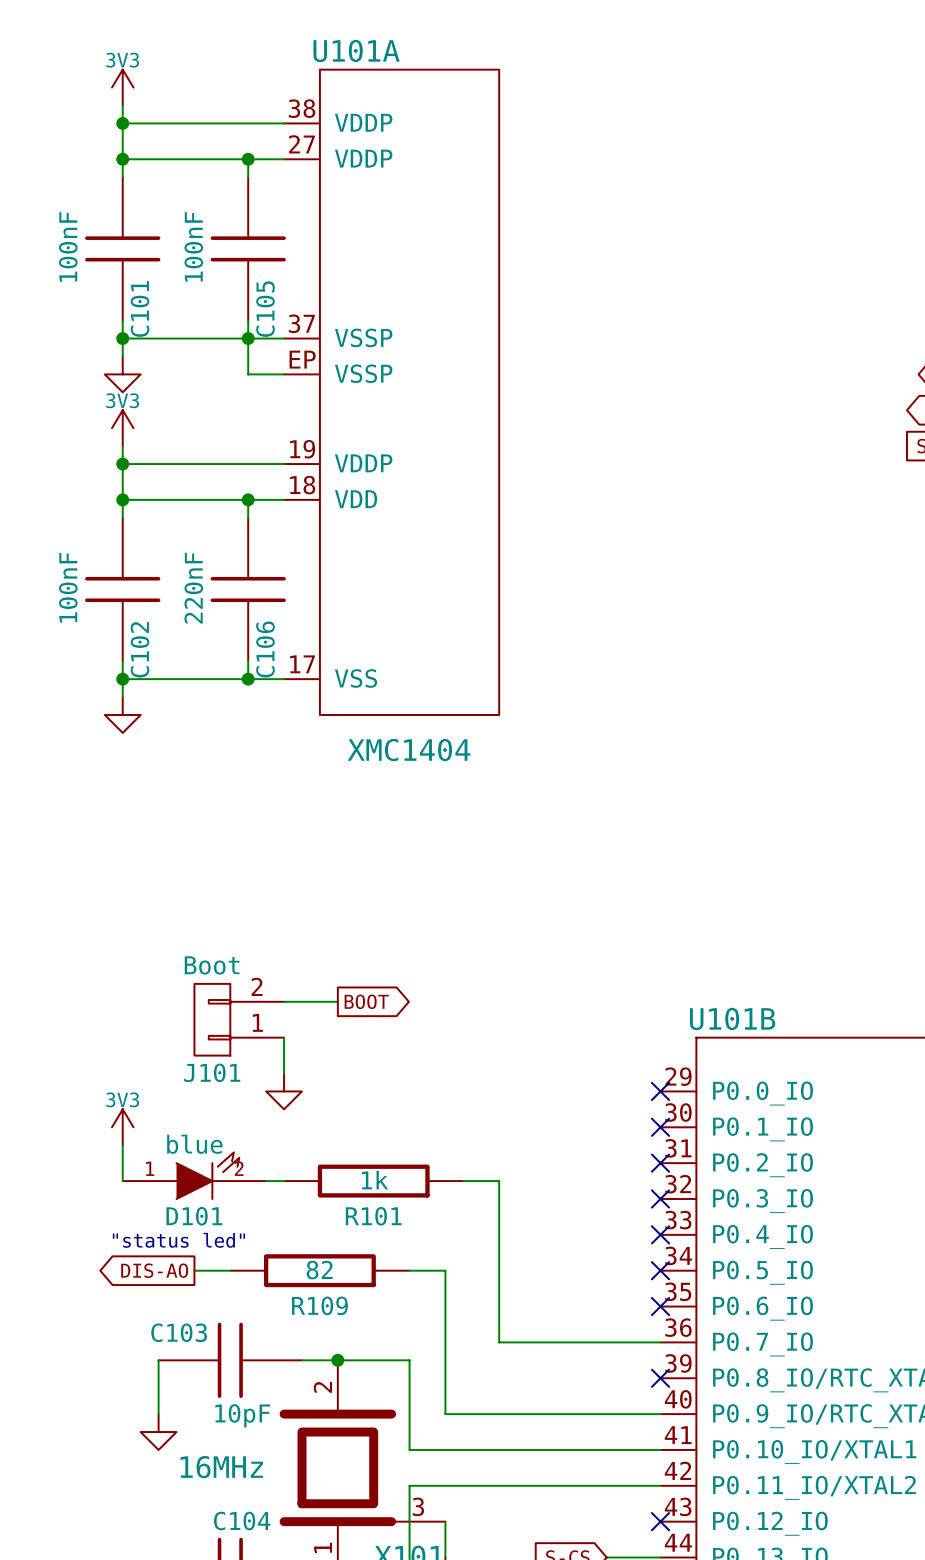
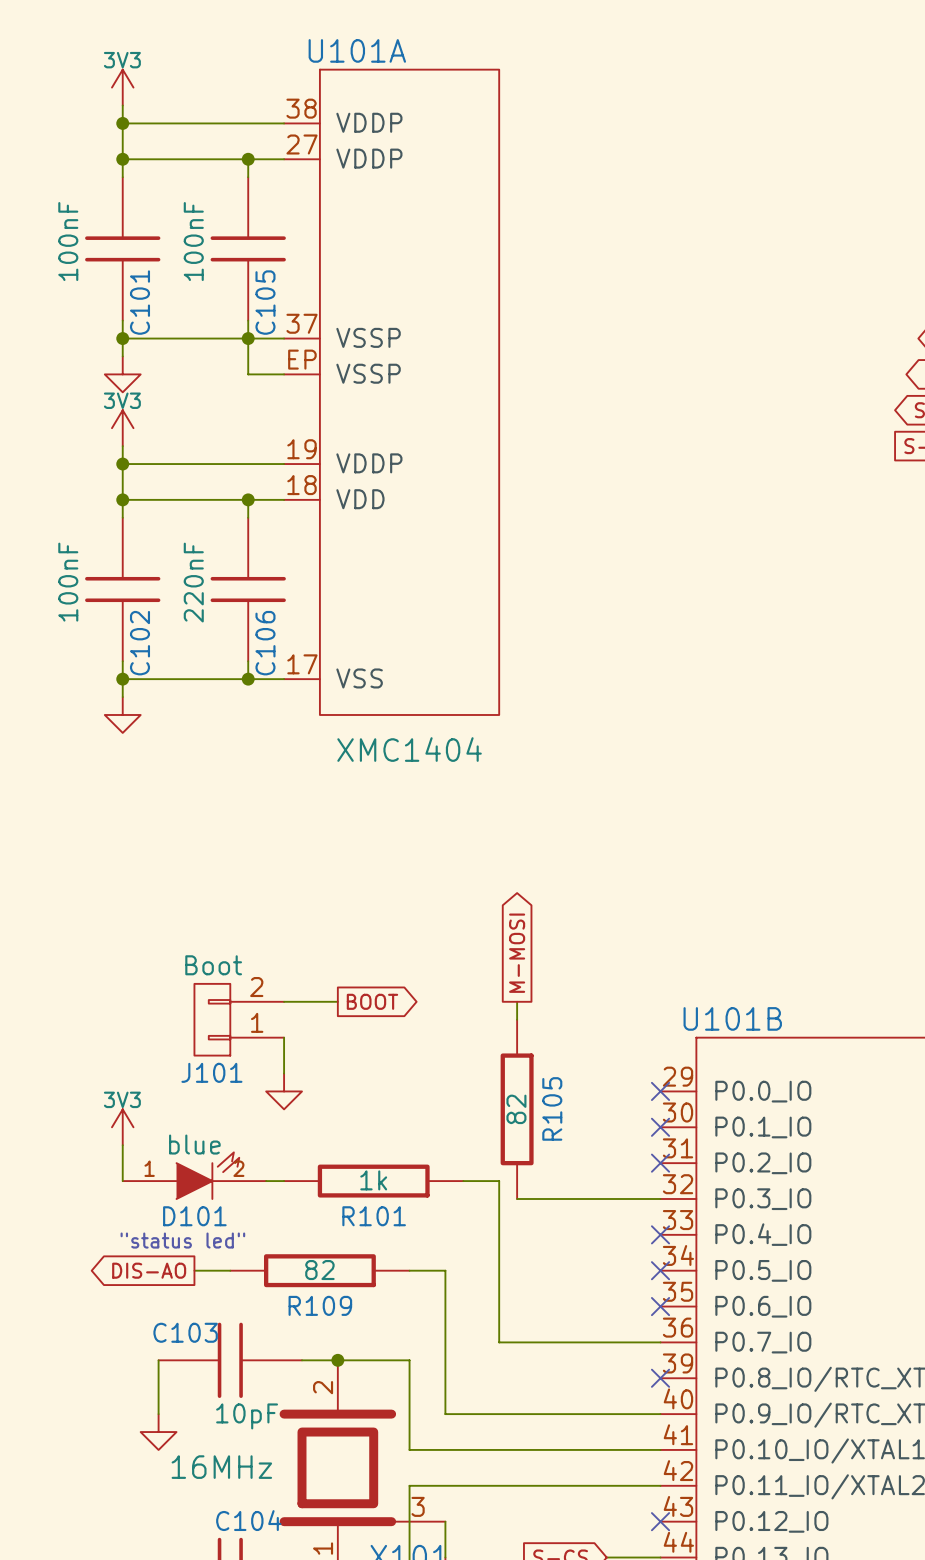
global label: none -> M-MOSI (517, 953)
wire: none -> (517, 1001) (517, 1019)
R105: none -> 82 (517, 1109)
wire: none -> (517, 1198) (660, 1198)
no-connect mark: (660, 1198) -> none

